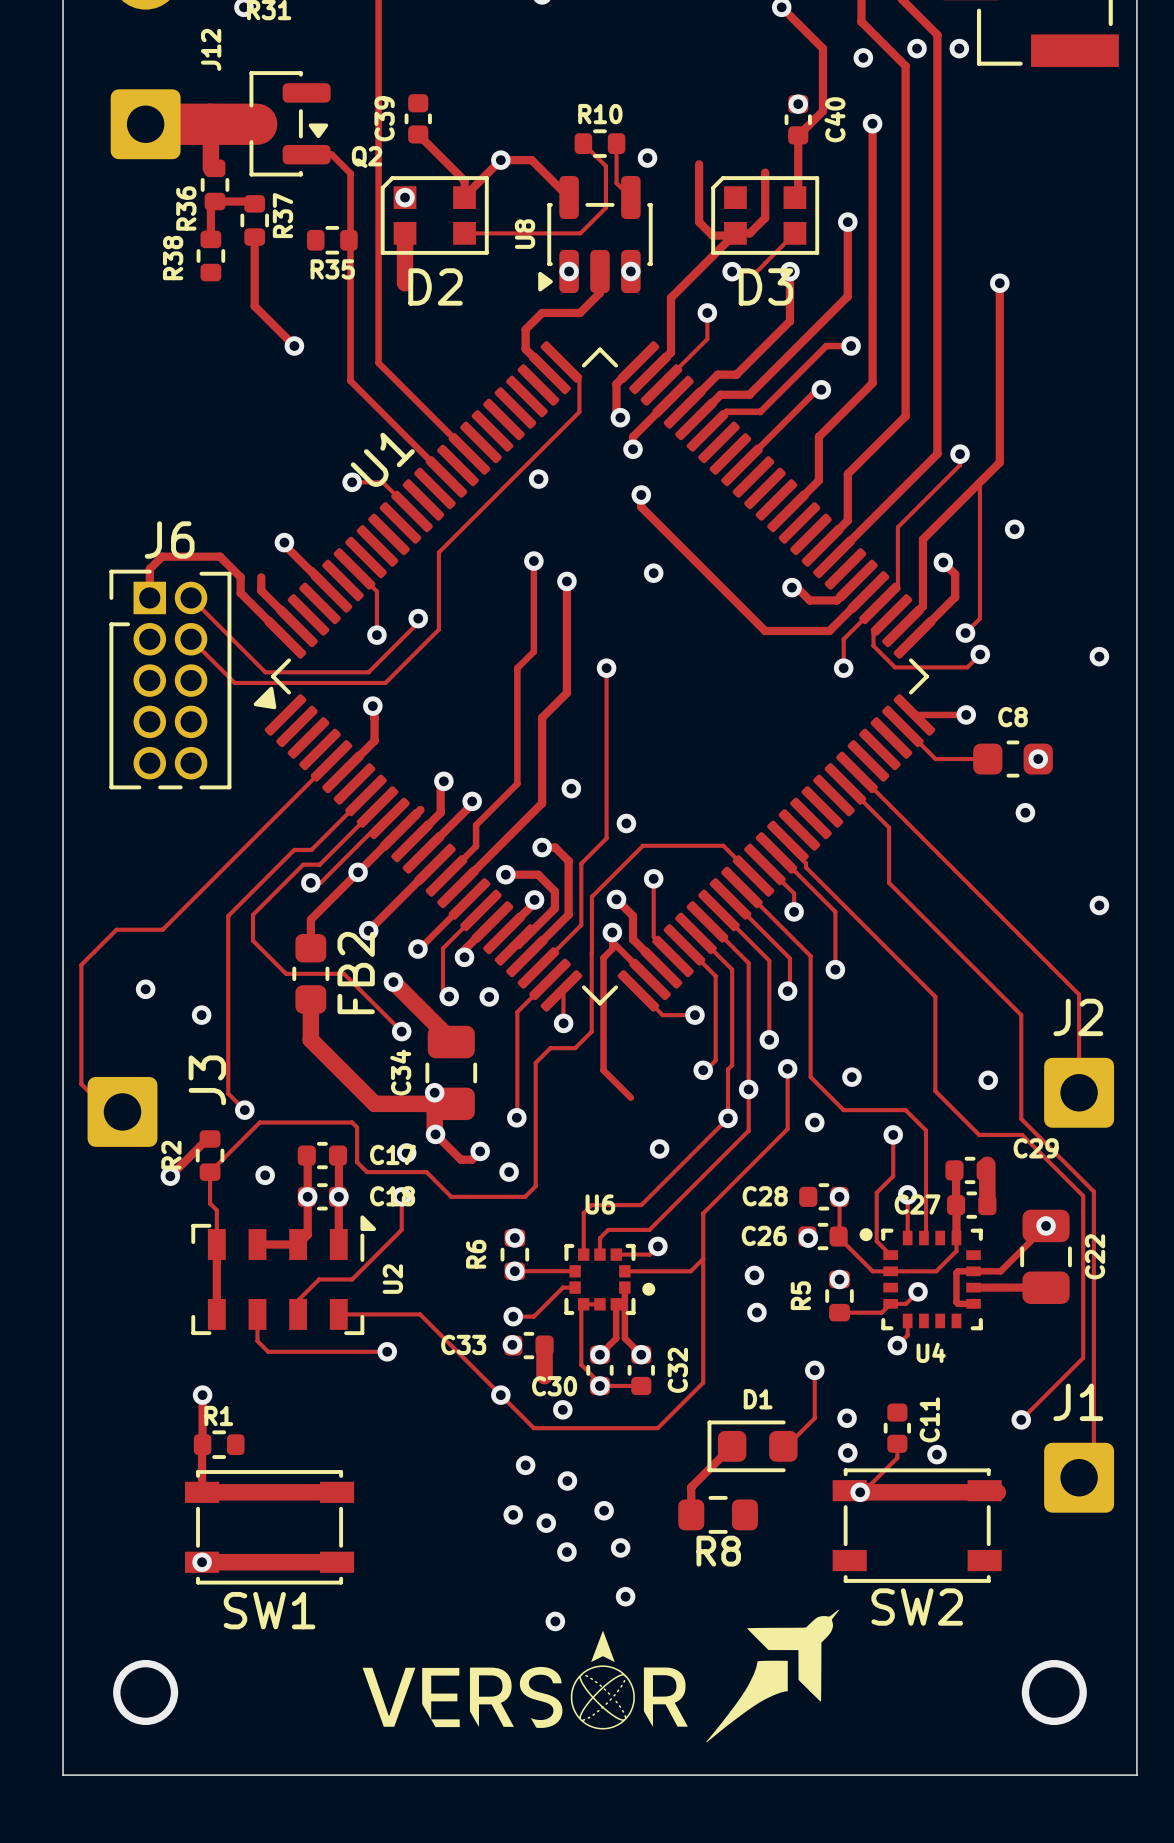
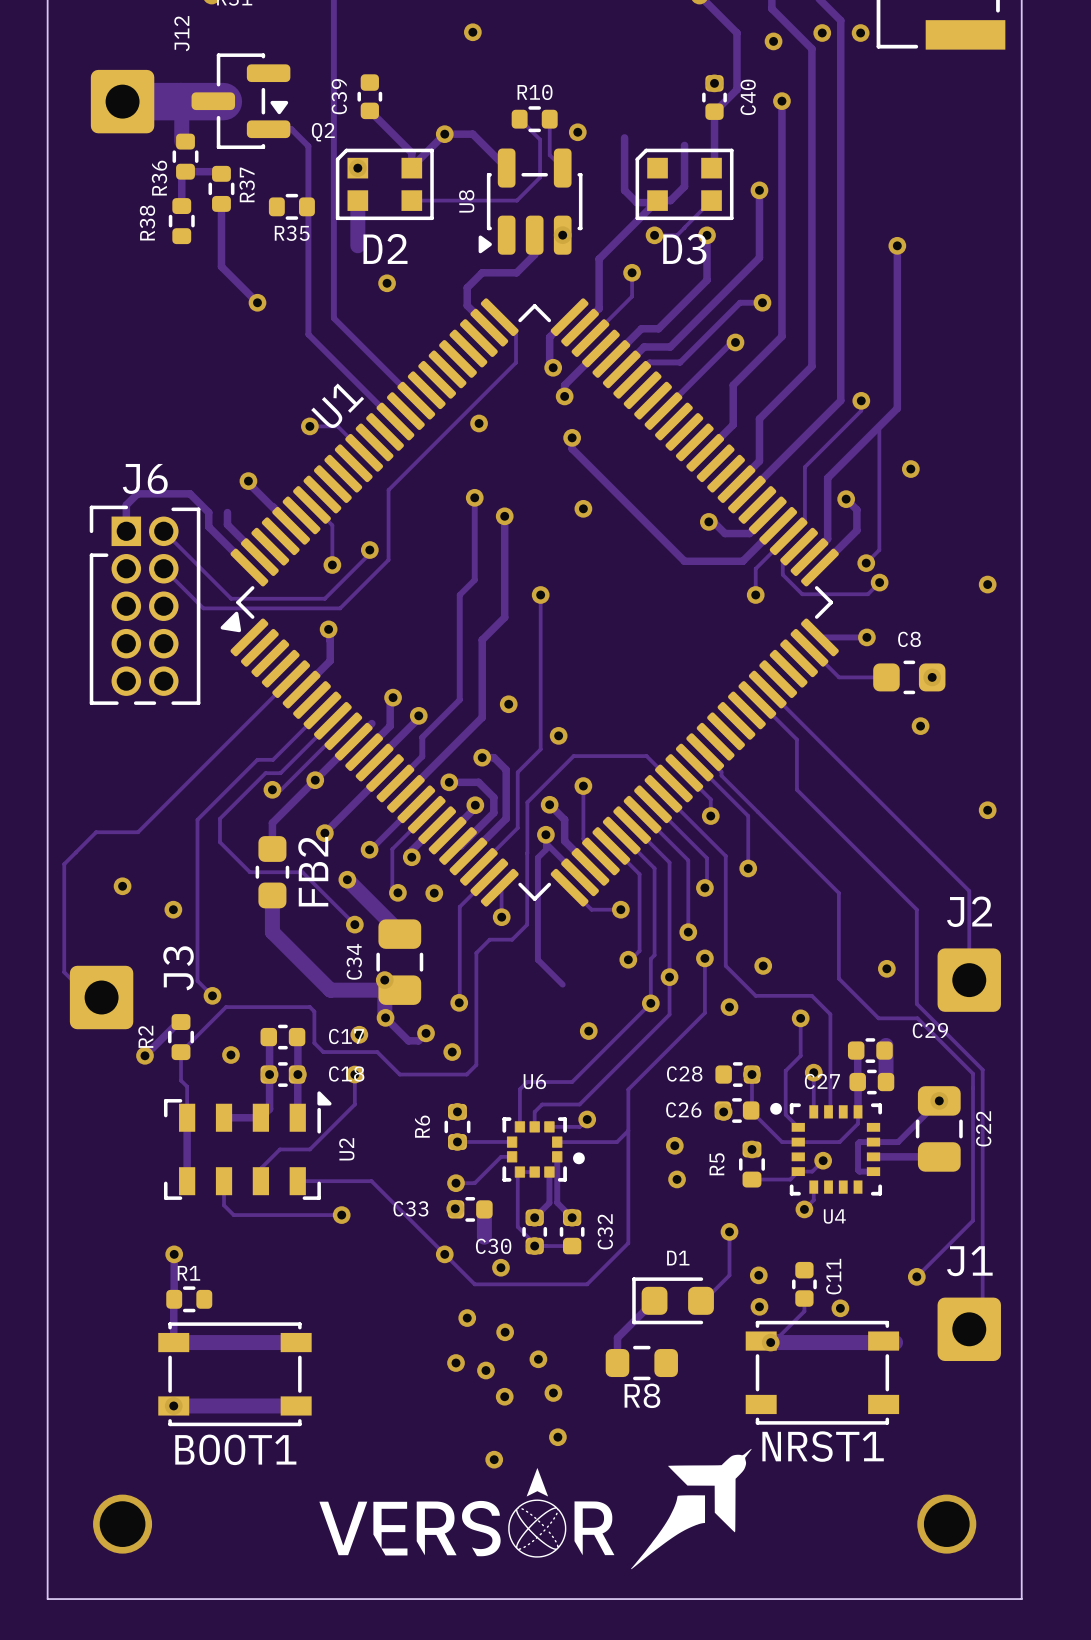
via: none -> (472, 32)
via: (569, 271) -> none
via: none -> (387, 283)
SW2 name: SW2 (917, 1607) -> NRST1 (823, 1446)
SW1 name: SW1 (269, 1610) -> BOOT1 (235, 1449)

